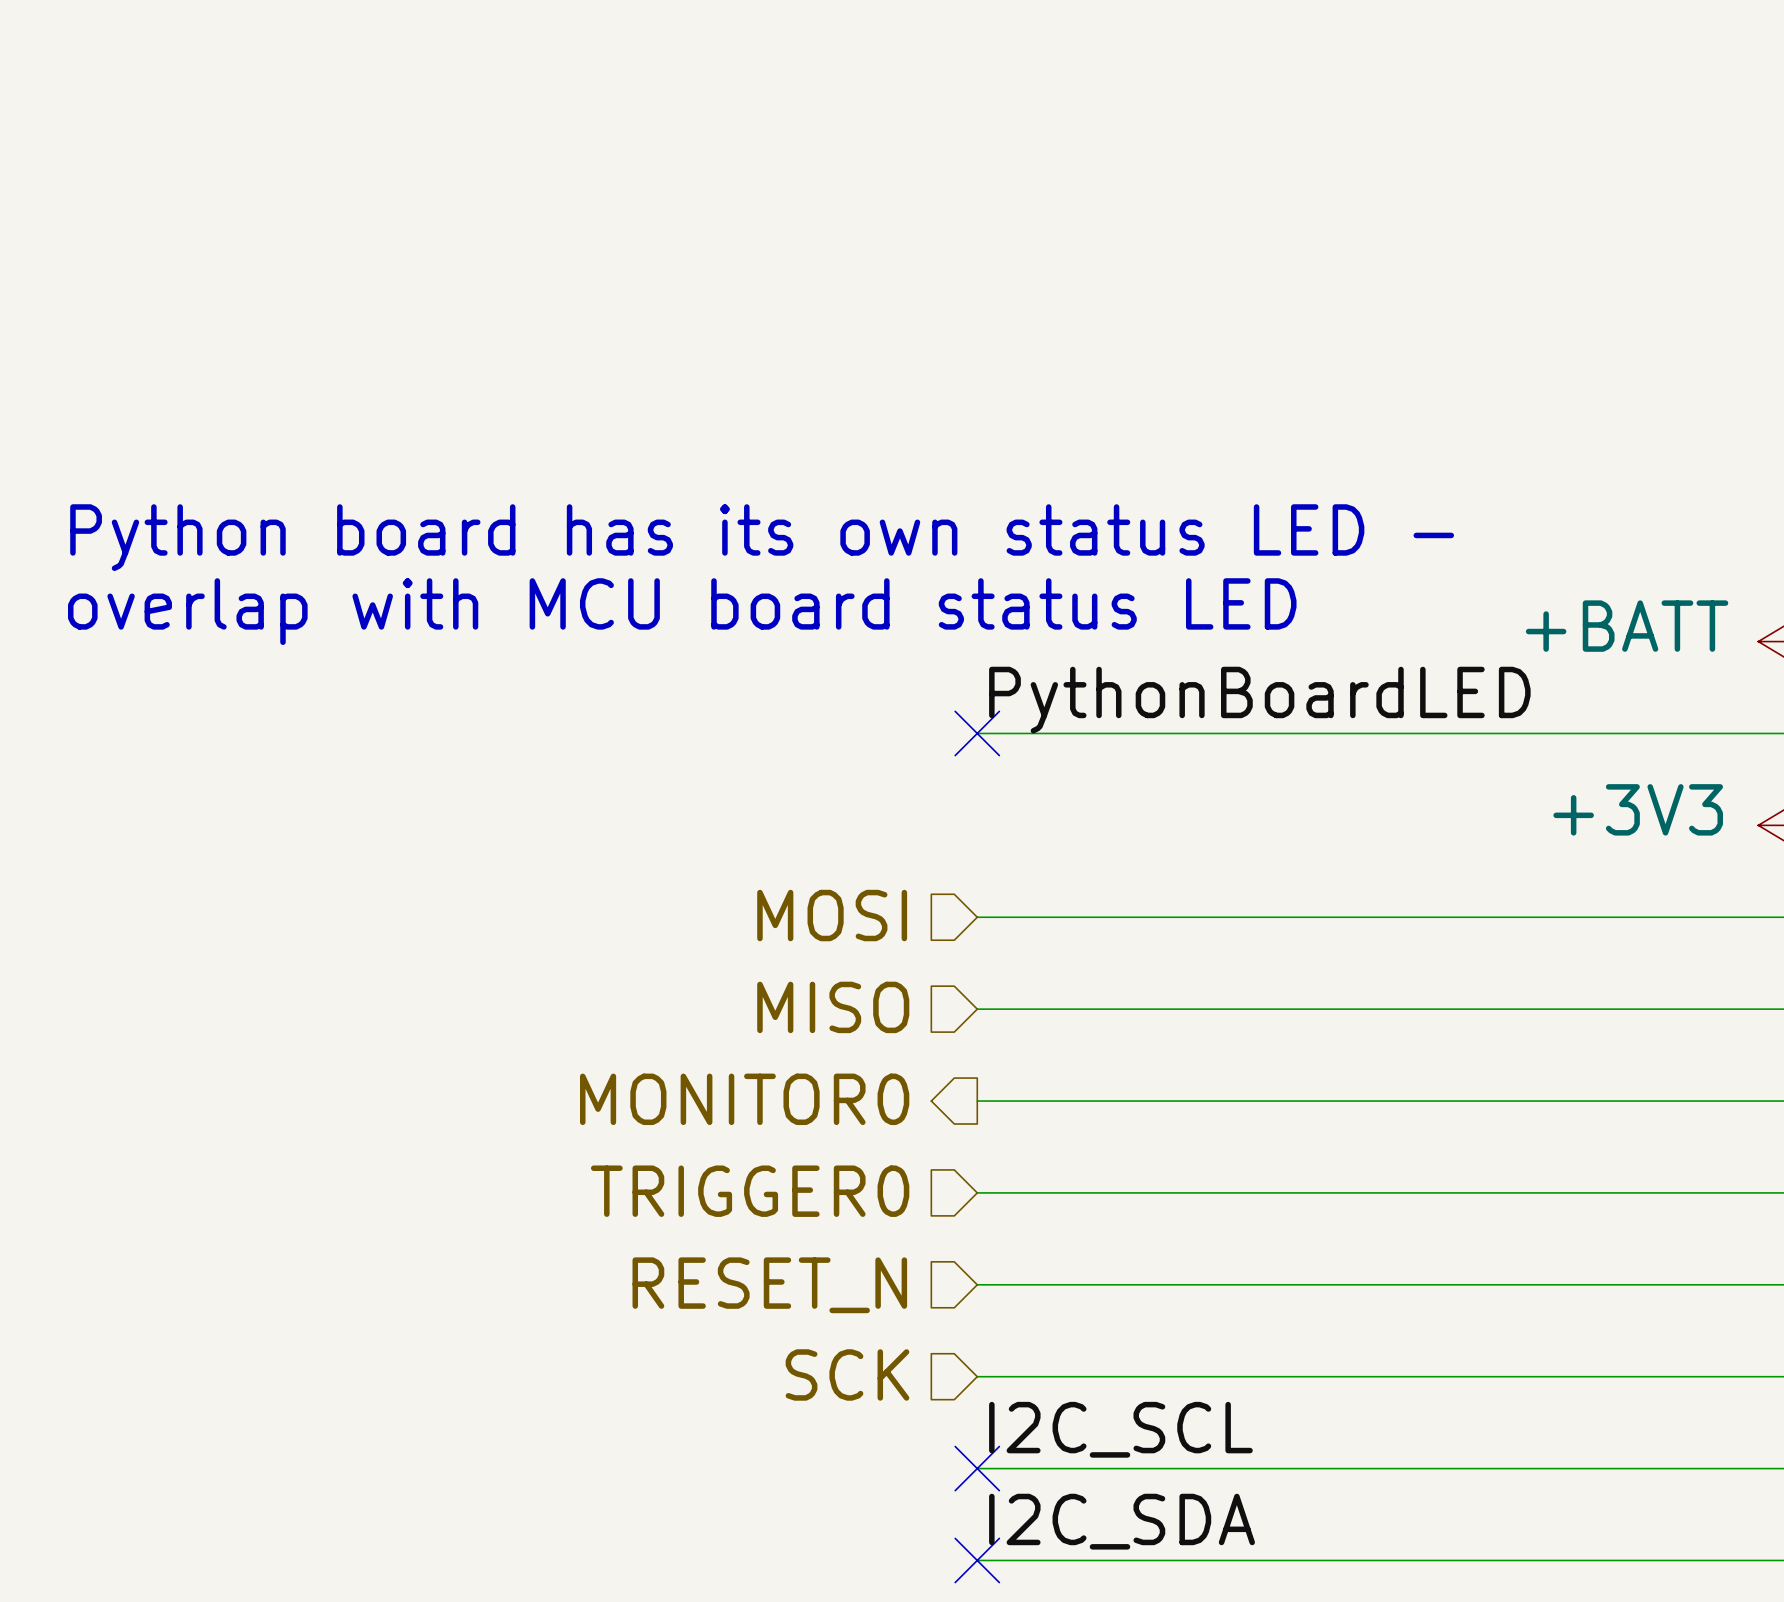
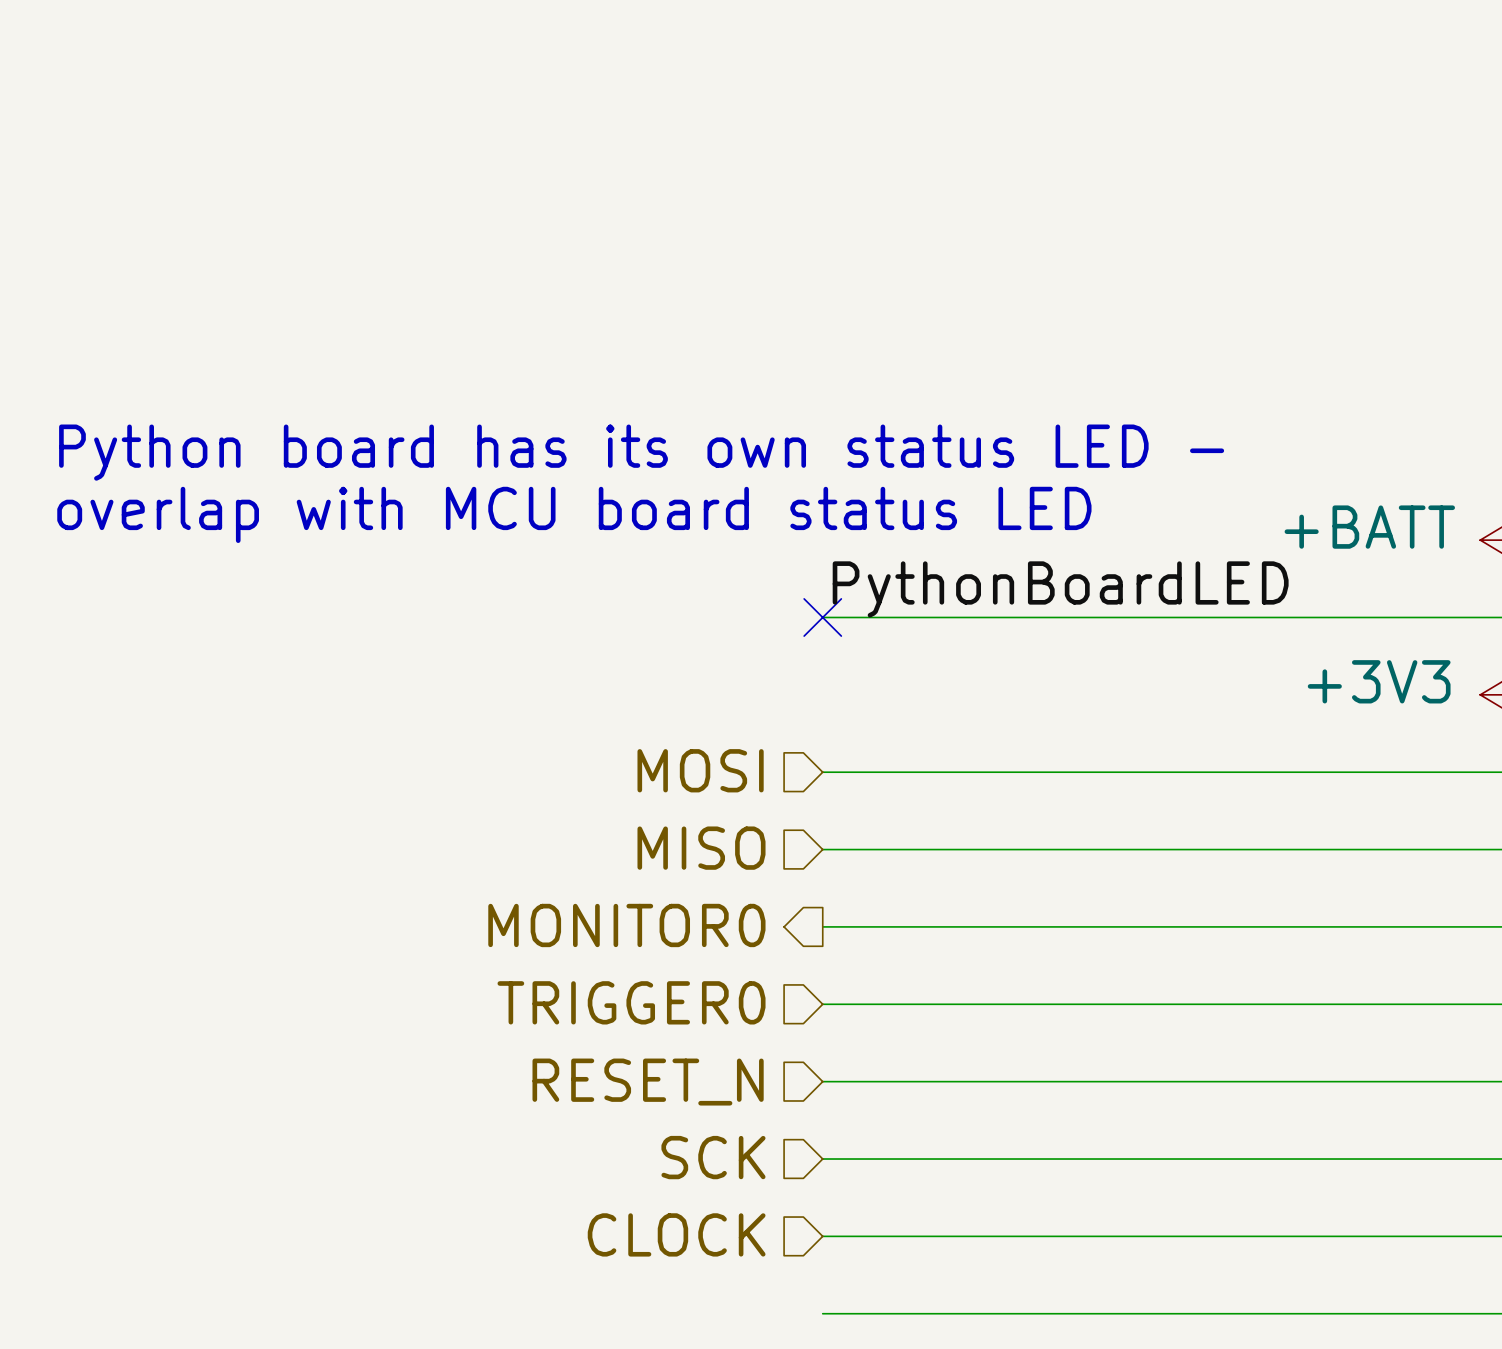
label: I2C_SCL (1120, 1429) -> none
hierarchical label: none -> CLOCK (676, 1234)
no-connect mark: (977, 1468) -> none
label: I2C_SDA (1122, 1521) -> none
no-connect mark: (977, 1560) -> none

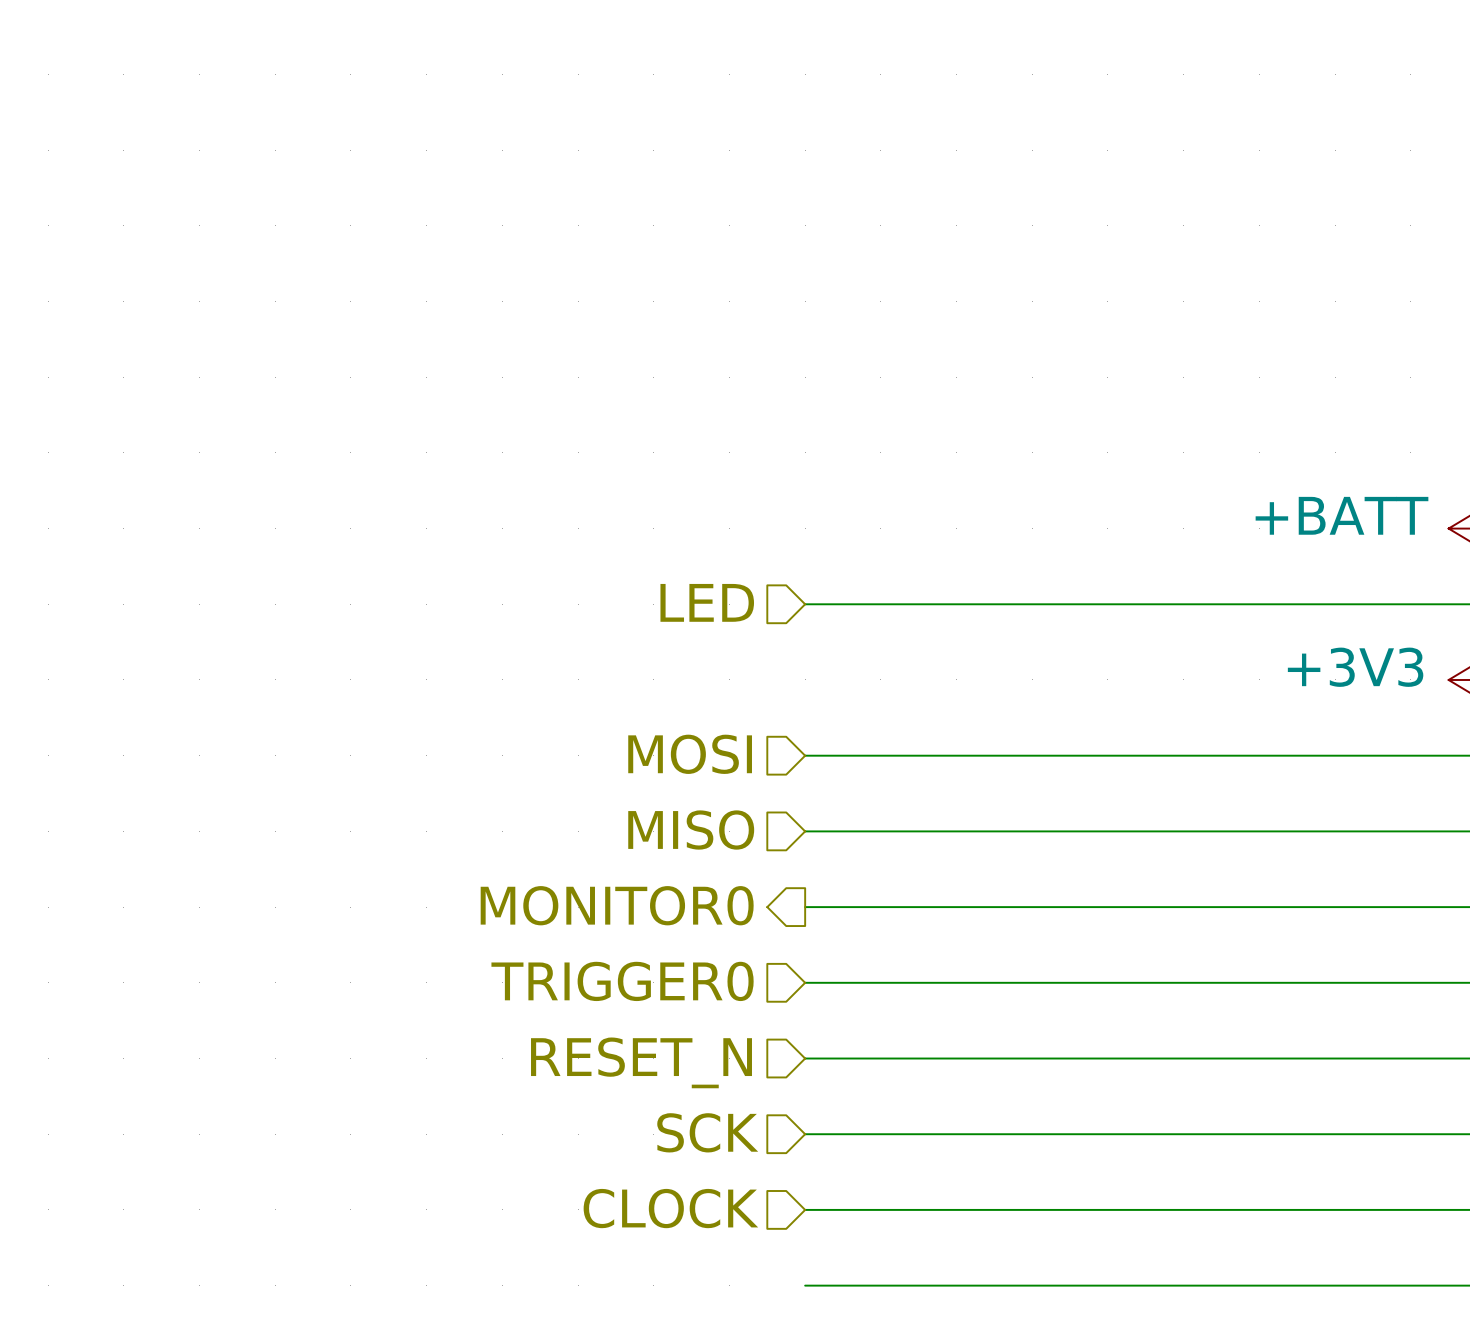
text: Python board has its own status LED - (641, 452) -> none
text: overlap with MCU board status LED (574, 514) -> none
label: PythonBoardLED (1060, 589) -> none
hierarchical label: none -> LED (707, 602)
no-connect mark: (822, 617) -> none

